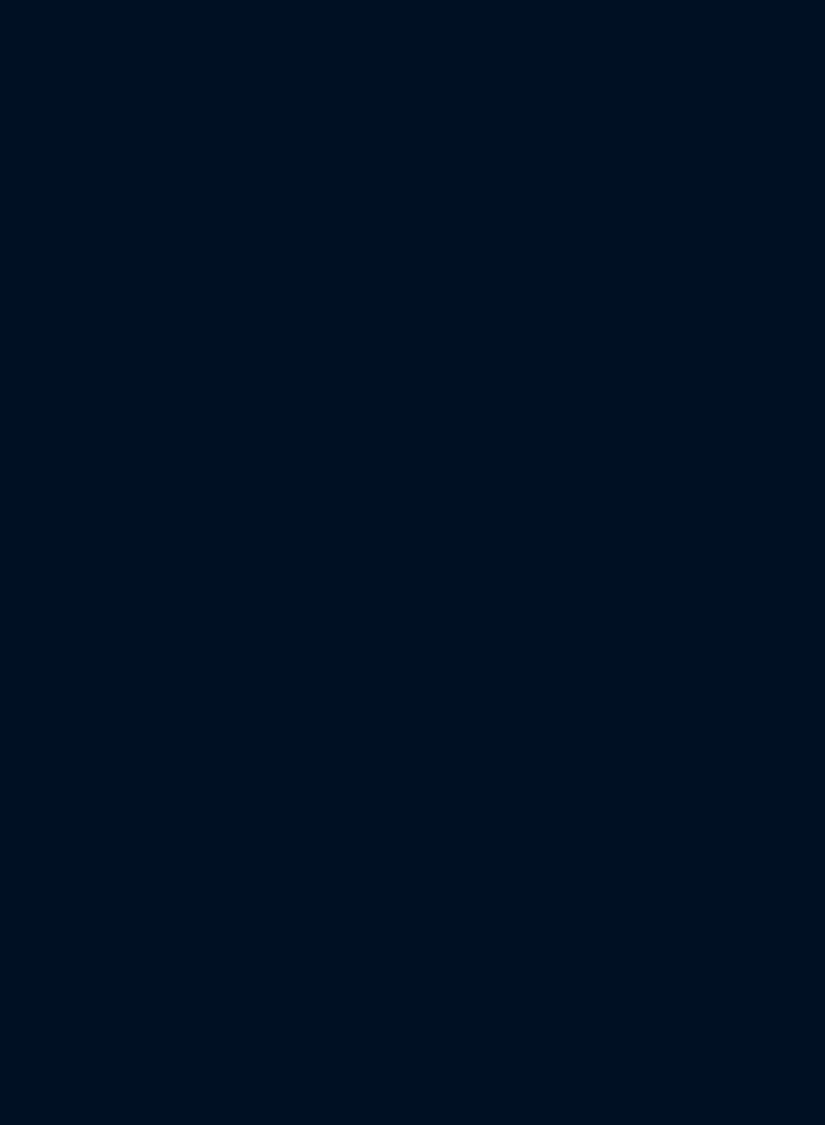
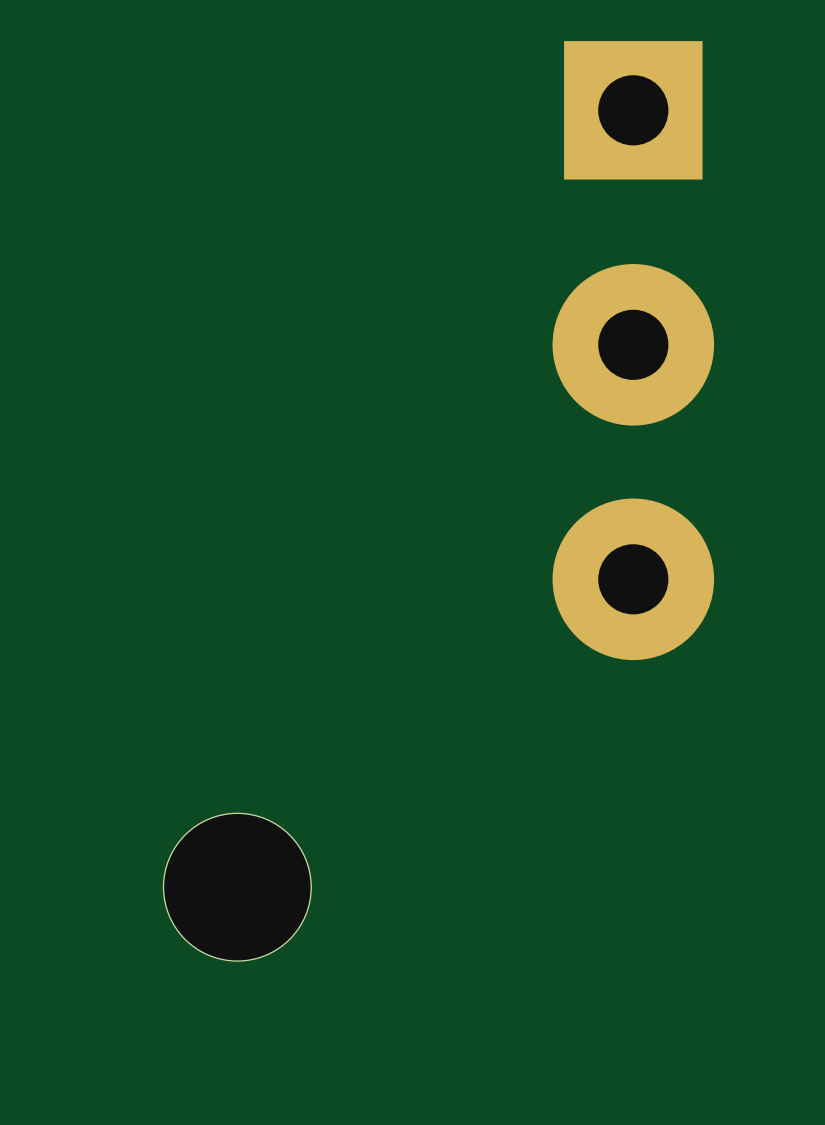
part: none -> (633, 350)
part: none -> (237, 887)

